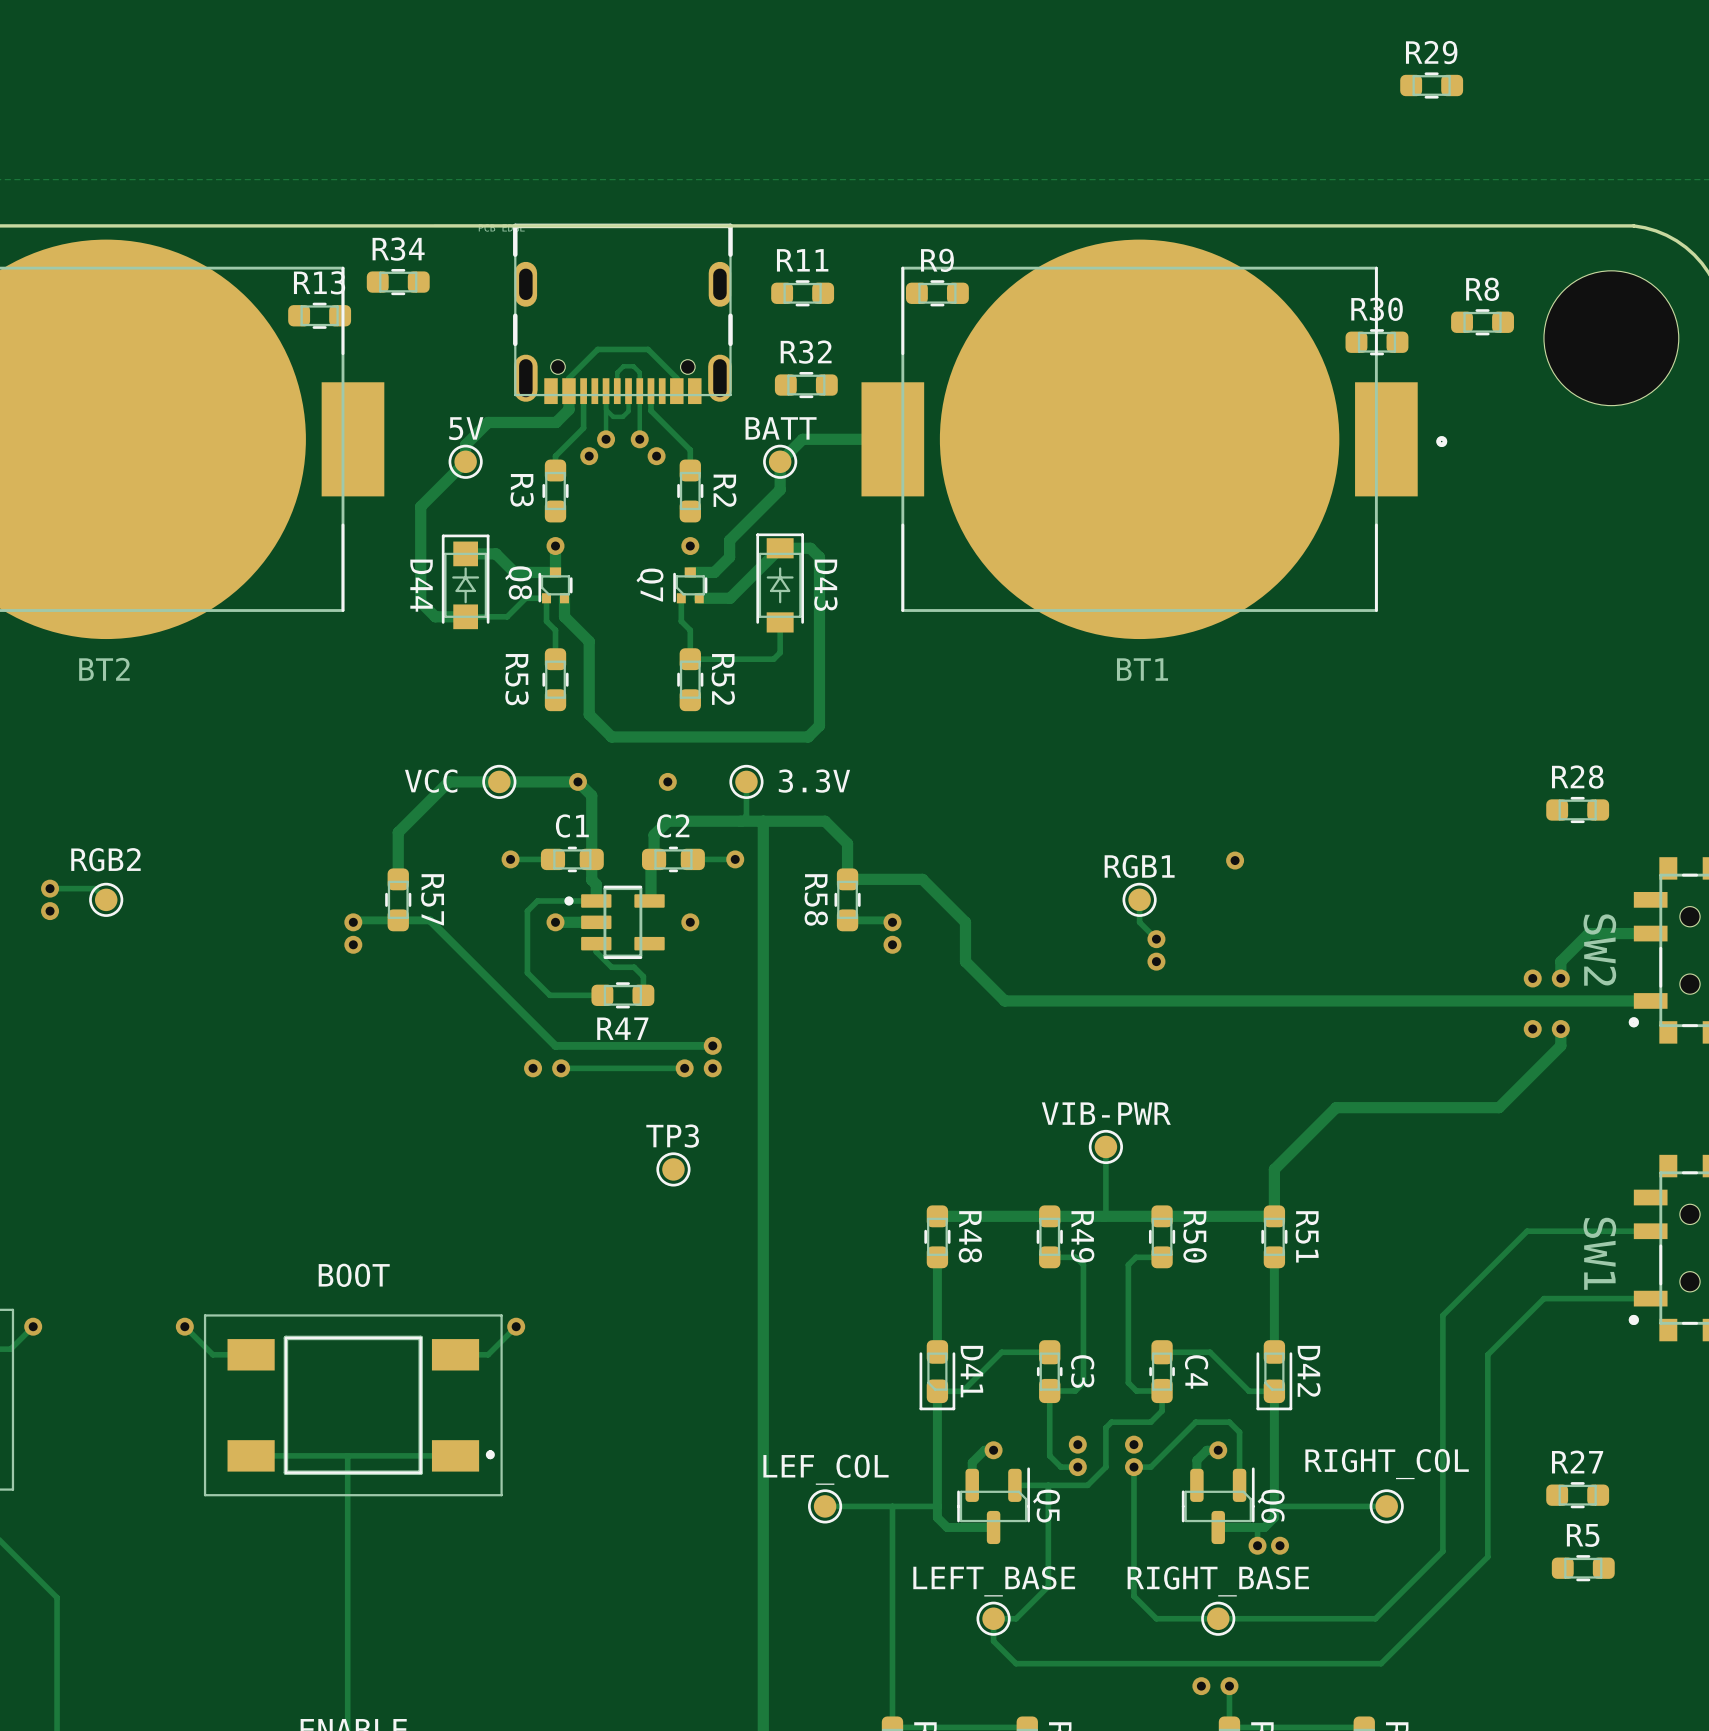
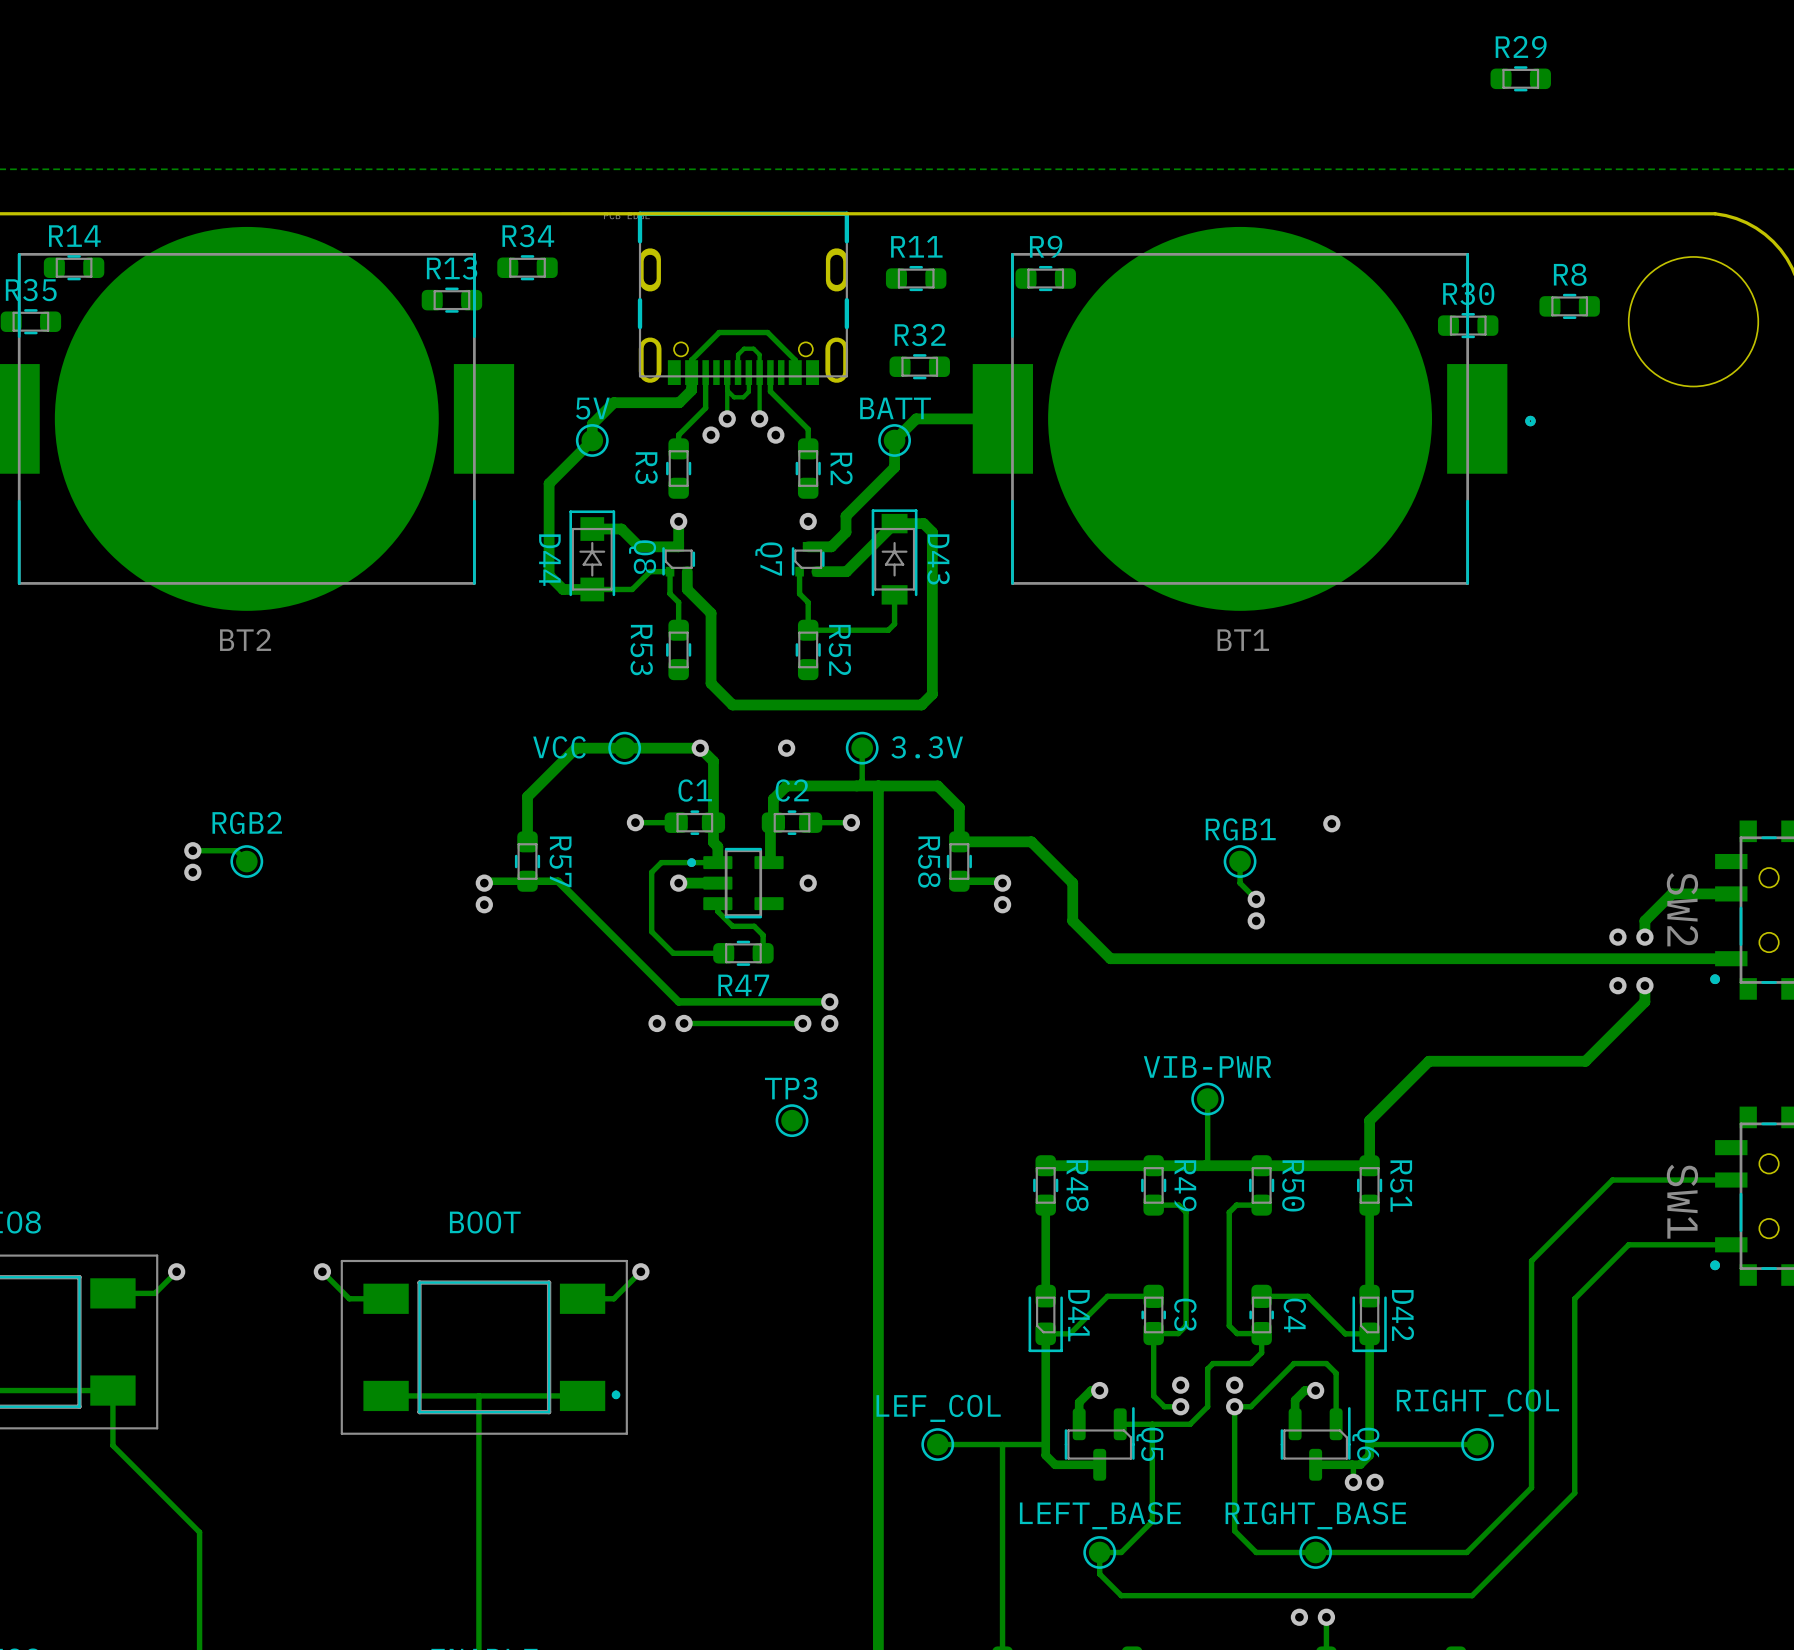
R28: (1577, 810) -> none
R27: (1577, 1495) -> none
R5: (1583, 1568) -> none

